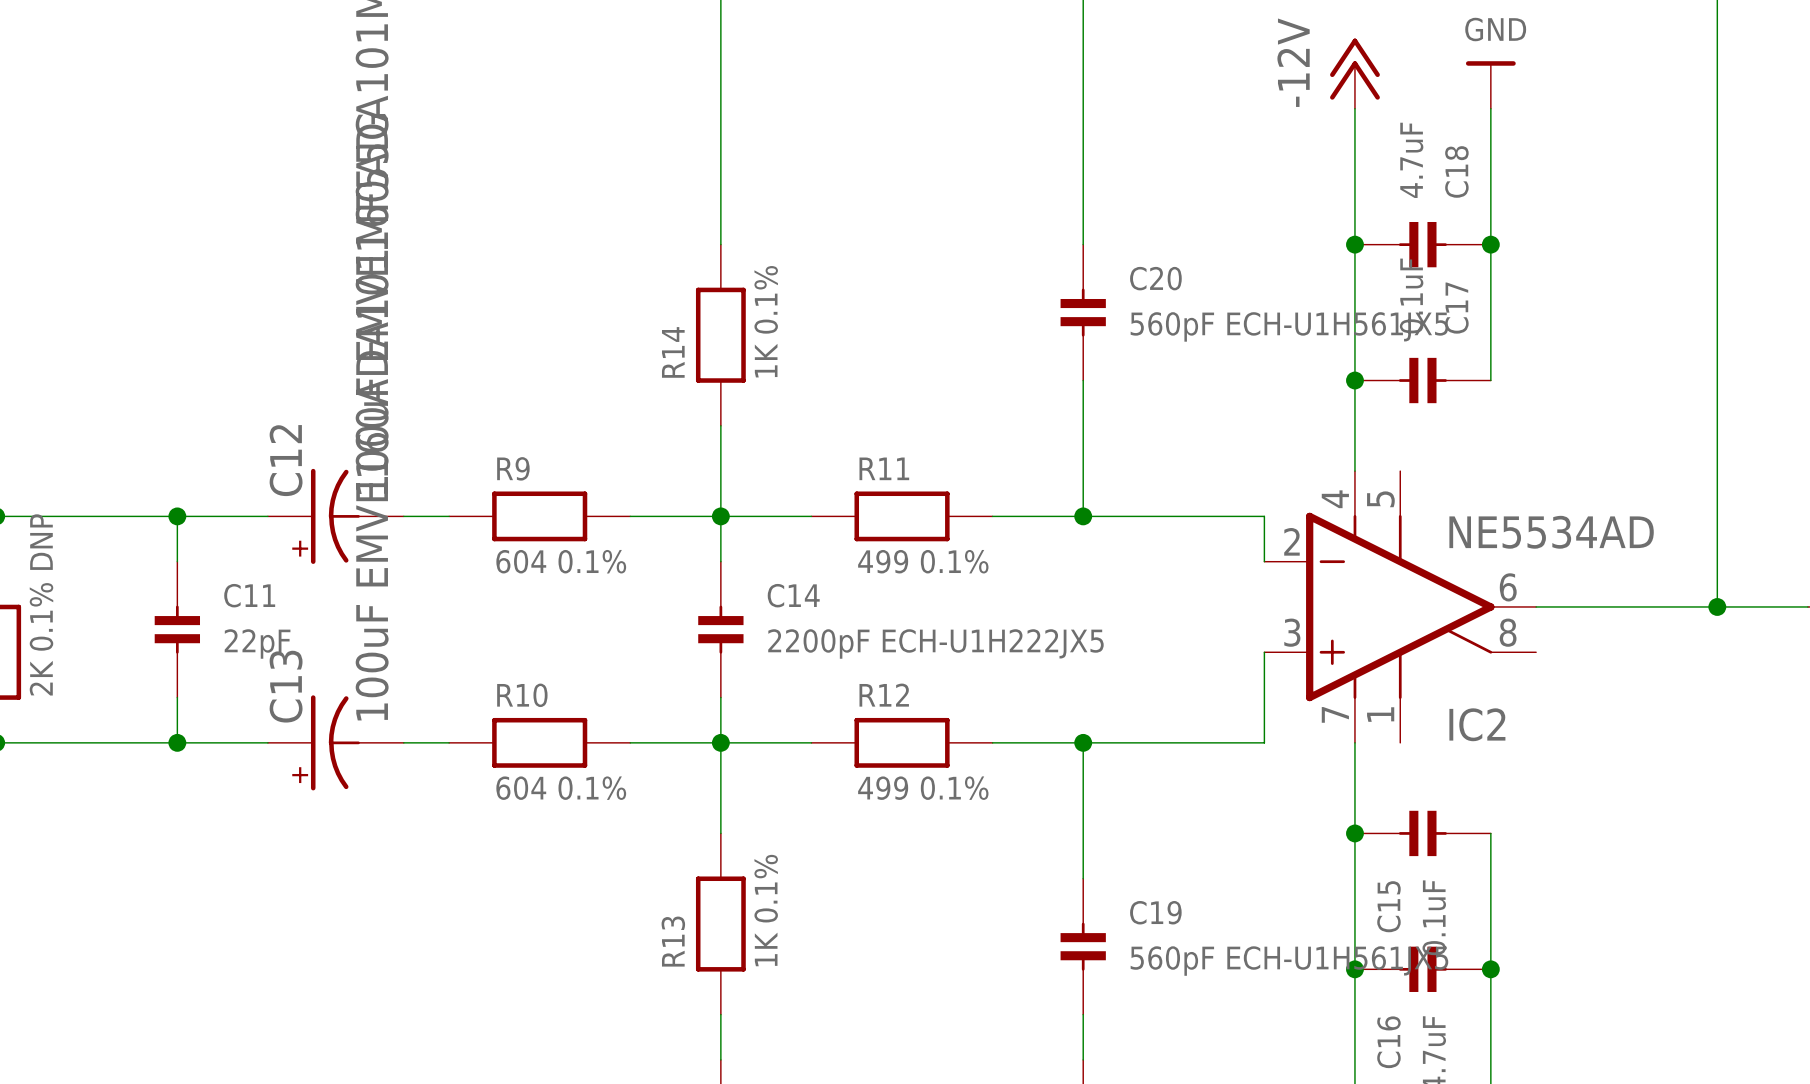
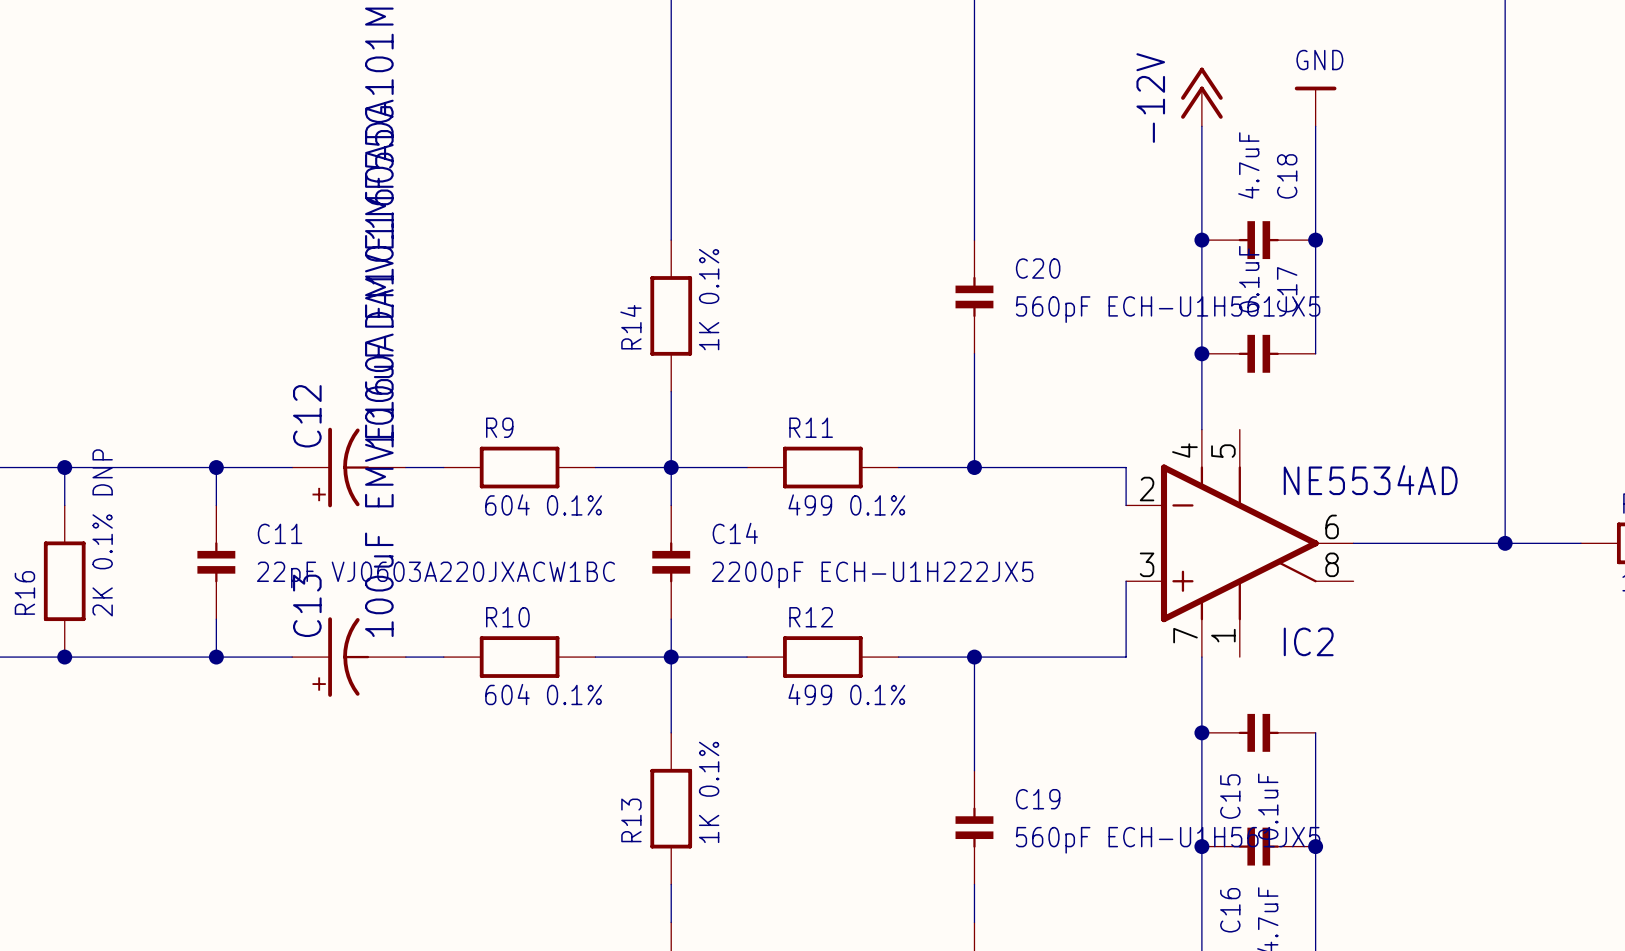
C11 value: 22pF (257, 643) -> 22pF VJ0603A220JXACW1BC (435, 574)

